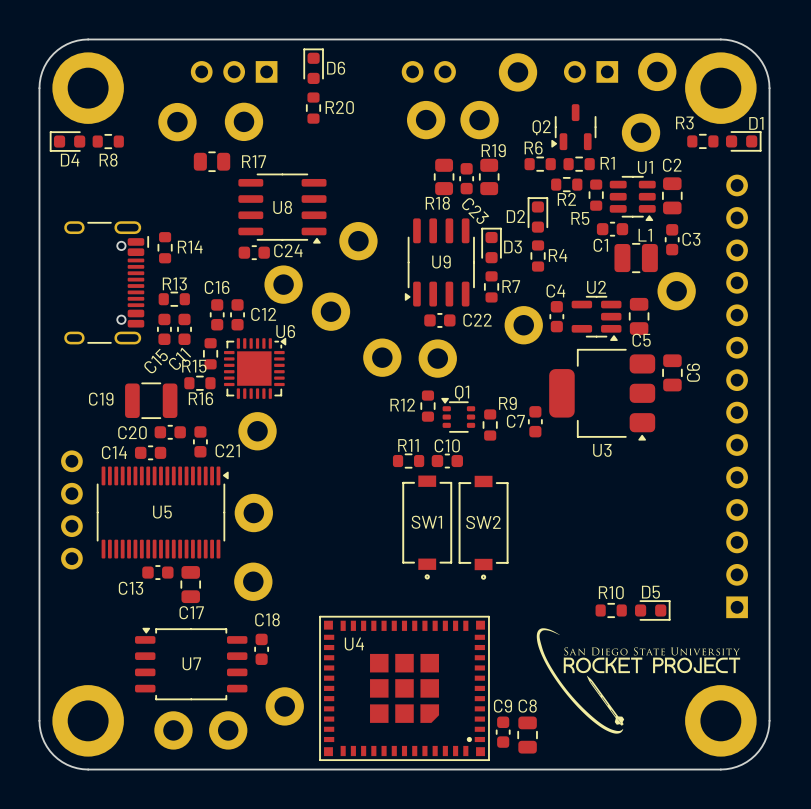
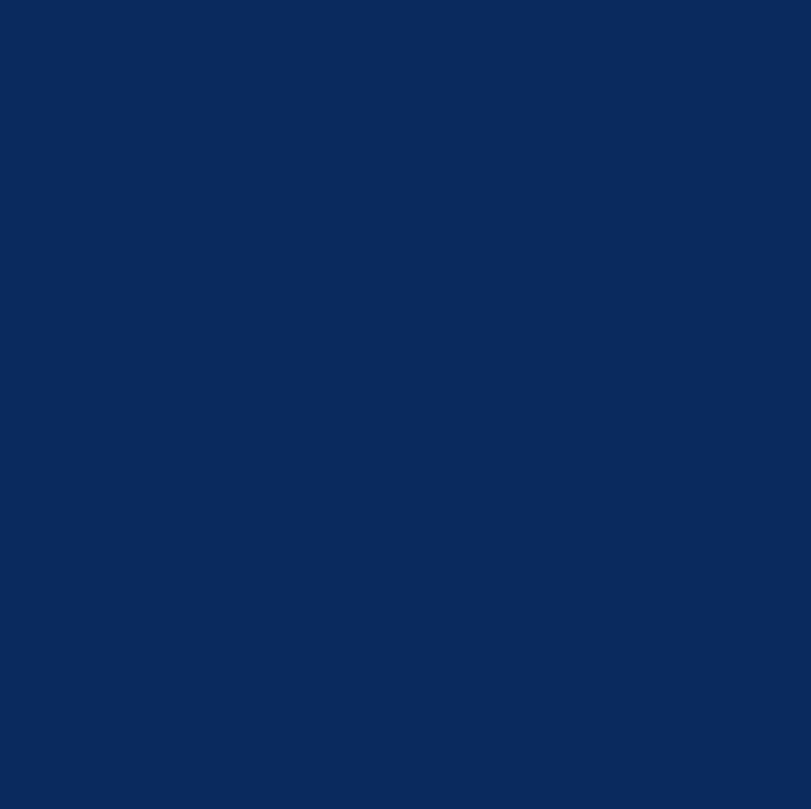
board edge: (88, 39) (720, 39) (736, 42) (755, 53) (764, 67) (769, 88) (769, 720) (764, 741) (755, 755) (741, 764) (720, 769) (88, 769) (67, 764) (53, 755) (44, 741) (39, 720) (39, 88) (44, 67) (53, 53) (72, 42) (88, 39) -> none
D6: (313, 66) -> none
part: (234, 71) -> none
part: (428, 71) -> none
part: (591, 71) -> none
part: (657, 71) -> none
part: (518, 72) -> none
part: (88, 88) -> none
part: (720, 88) -> none
R20: (313, 108) -> none
part: (426, 120) -> none
part: (479, 120) -> none
part: (243, 121) -> none
part: (177, 122) -> none
Q2: (573, 127) -> none
part: (641, 132) -> none
D4: (67, 141) -> none
R8: (108, 141) -> none
R3: (702, 141) -> none
D1: (743, 141) -> none
R17: (212, 161) -> none
R6: (540, 164) -> none
R1: (579, 164) -> none
R18: (444, 176) -> none
R19: (489, 176) -> none
C23: (466, 178) -> none
R2: (566, 184) -> none
R5: (596, 195) -> none
C2: (672, 195) -> none
U1: (632, 198) -> none
U8: (282, 208) -> none
D2: (537, 214) -> none
C1: (612, 229) -> none
C3: (672, 239) -> none
part: (358, 241) -> none
D3: (491, 245) -> none
R14: (165, 247) -> none
C24: (254, 252) -> none
R4: (538, 255) -> none
L1: (636, 258) -> none
U9: (439, 262) -> none
part: (106, 282) -> none
part: (283, 284) -> none
R7: (491, 286) -> none
part: (676, 291) -> none
R13: (174, 299) -> none
part: (330, 311) -> none
C16: (217, 314) -> none
C12: (237, 314) -> none
C4: (556, 316) -> none
C5: (639, 316) -> none
U2: (596, 318) -> none
C22: (439, 320) -> none
part: (523, 325) -> none
C15: (164, 329) -> none
C11: (184, 329) -> none
R15: (210, 353) -> none
part: (382, 357) -> none
part: (437, 358) -> none
U6: (255, 368) -> none
C6: (672, 372) -> none
R16: (199, 383) -> none
U3: (602, 394) -> none
part: (737, 396) -> none
C19: (151, 400) -> none
R12: (427, 406) -> none
Q1: (458, 415) -> none
C7: (535, 421) -> none
R9: (490, 425) -> none
part: (257, 431) -> none
C20: (170, 432) -> none
C21: (200, 441) -> none
C14: (150, 452) -> none
R11: (408, 461) -> none
C10: (447, 461) -> none
part: (71, 509) -> none
U5: (162, 512) -> none
part: (253, 513) -> none
SW1: (427, 527) -> none
SW2: (483, 527) -> none
C13: (157, 572) -> none
part: (253, 581) -> none
C17: (190, 584) -> none
R10: (611, 610) -> none
D5: (652, 610) -> none
drawing: [536, 628, 741, 734] -> none
C18: (261, 649) -> none
U7: (191, 663) -> none
U4: (404, 688) -> none
part: (284, 706) -> none
part: (88, 720) -> none
part: (720, 720) -> none
part: (173, 730) -> none
part: (228, 730) -> none
C9: (503, 732) -> none
C8: (527, 735) -> none

